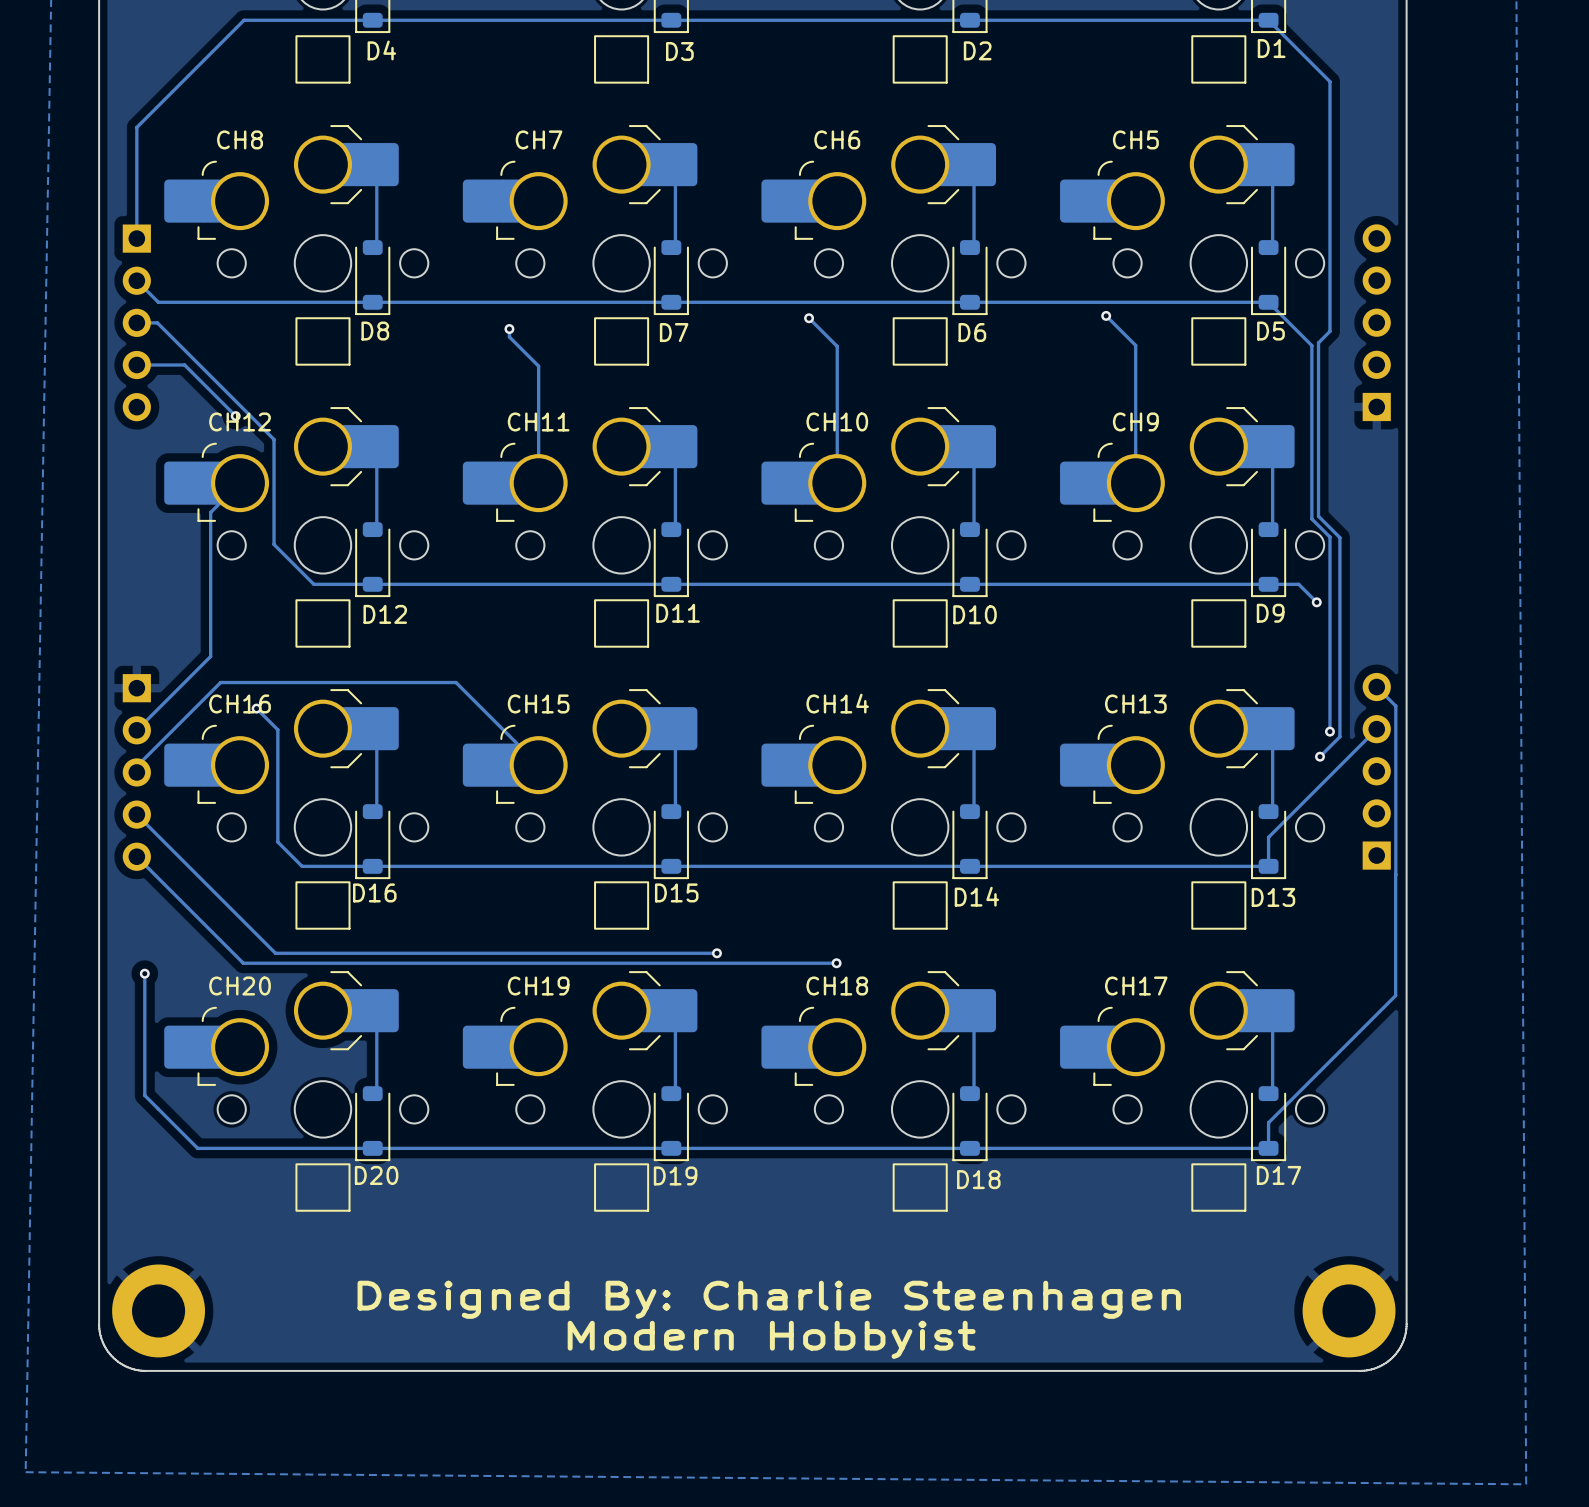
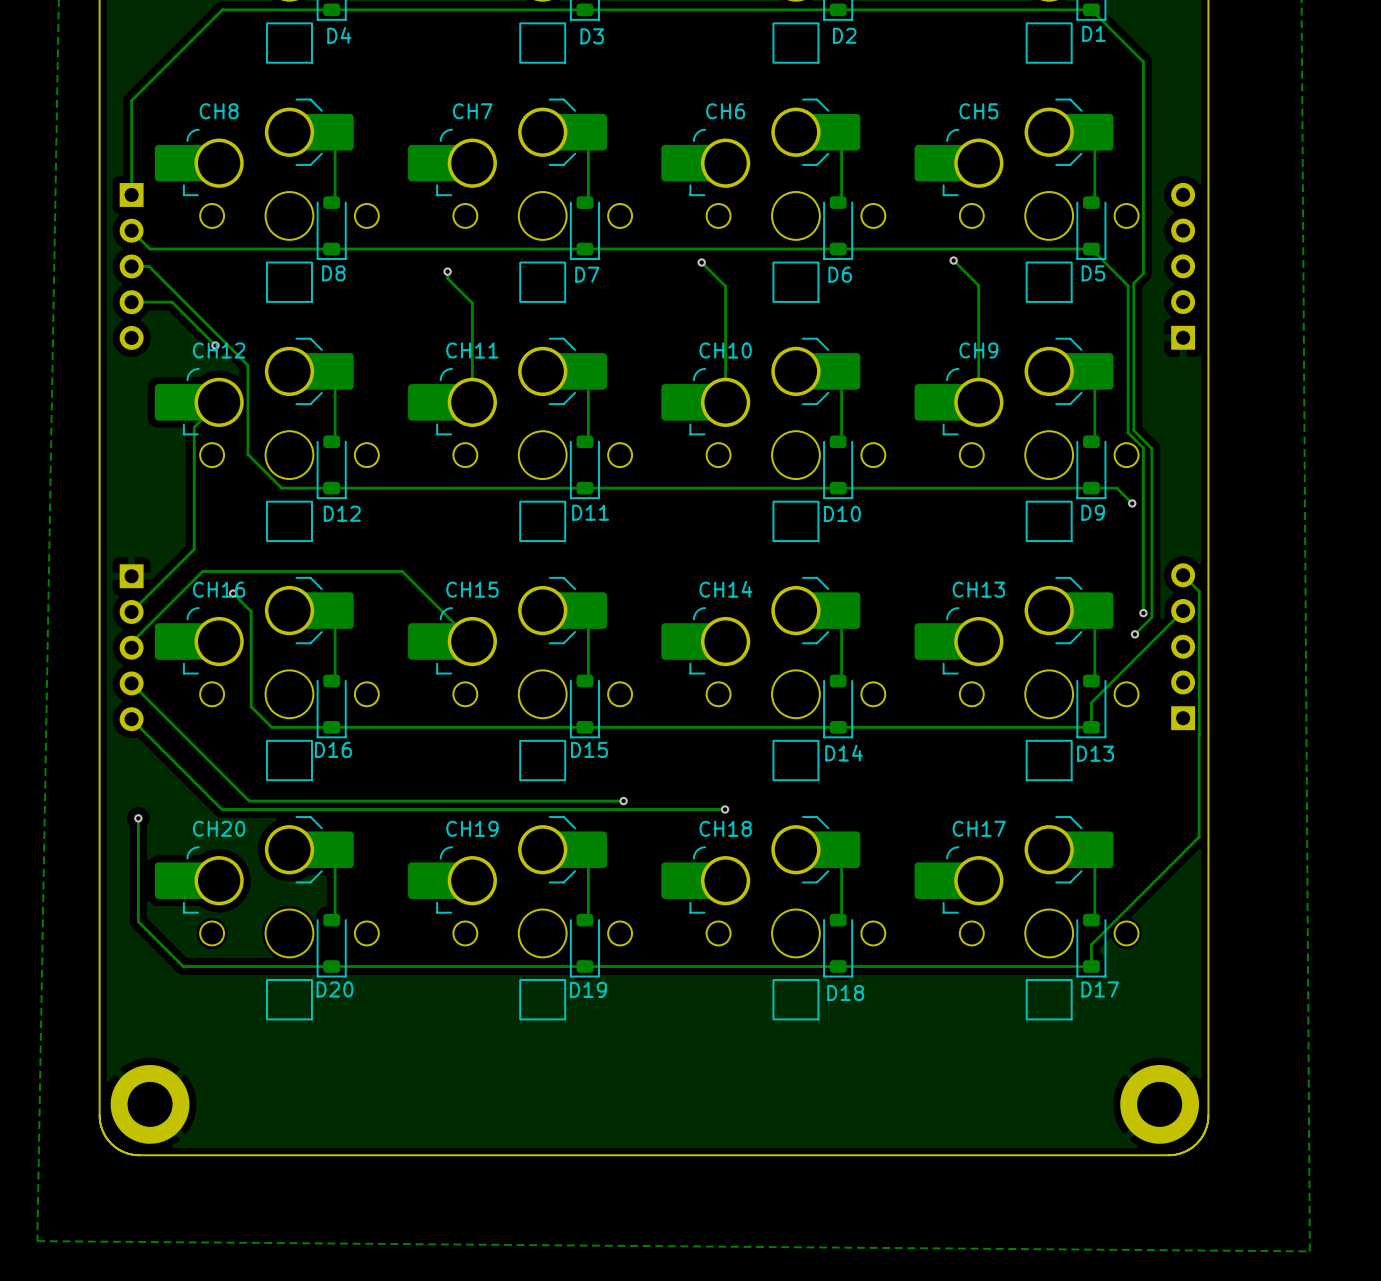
text: Designed By: Charlie Steenhagen (769, 1299) -> none
text: Modern Hobbyist (771, 1339) -> none

